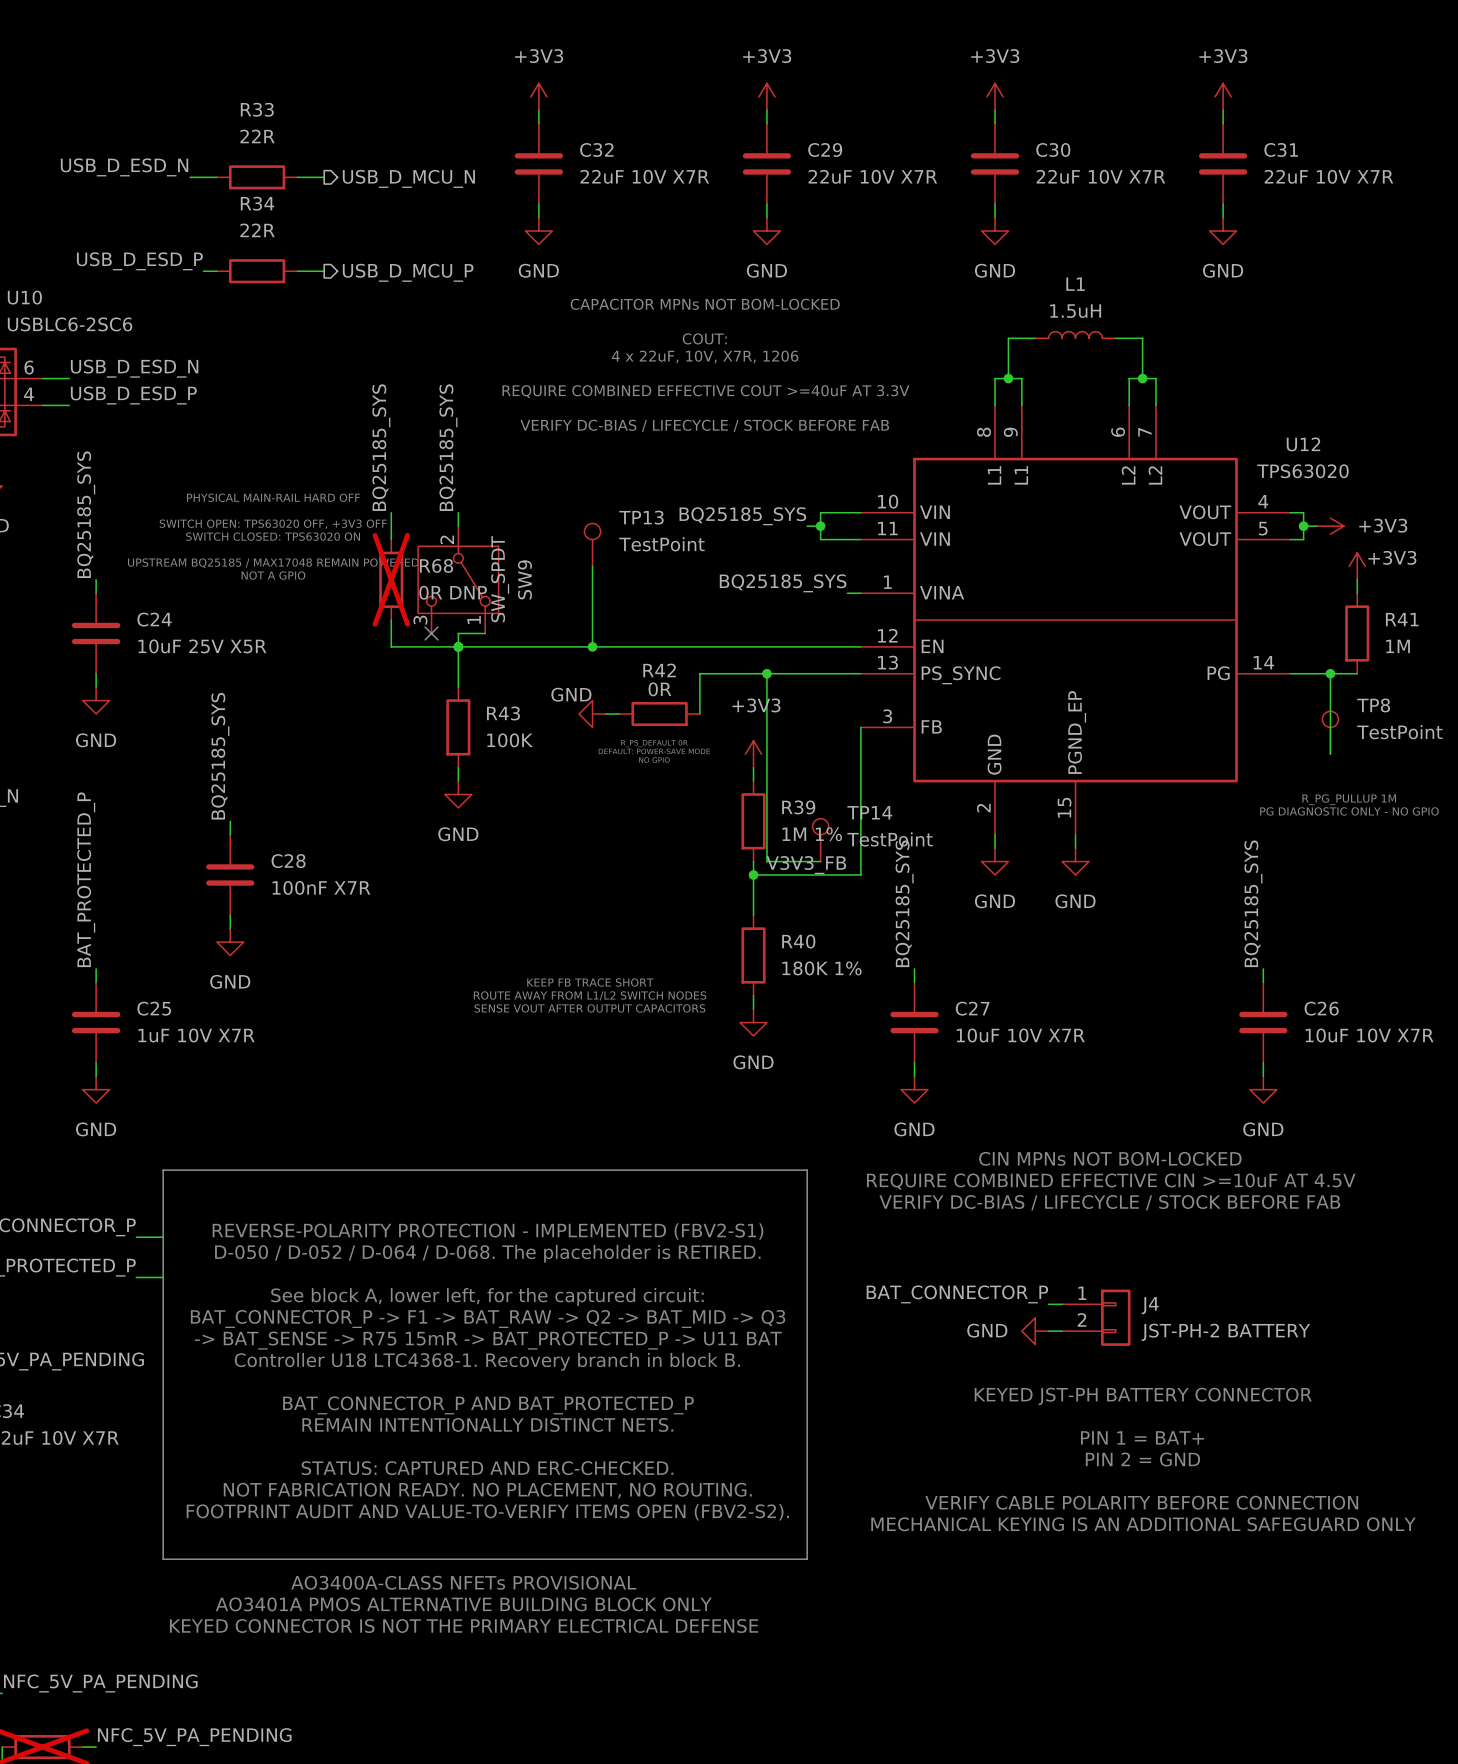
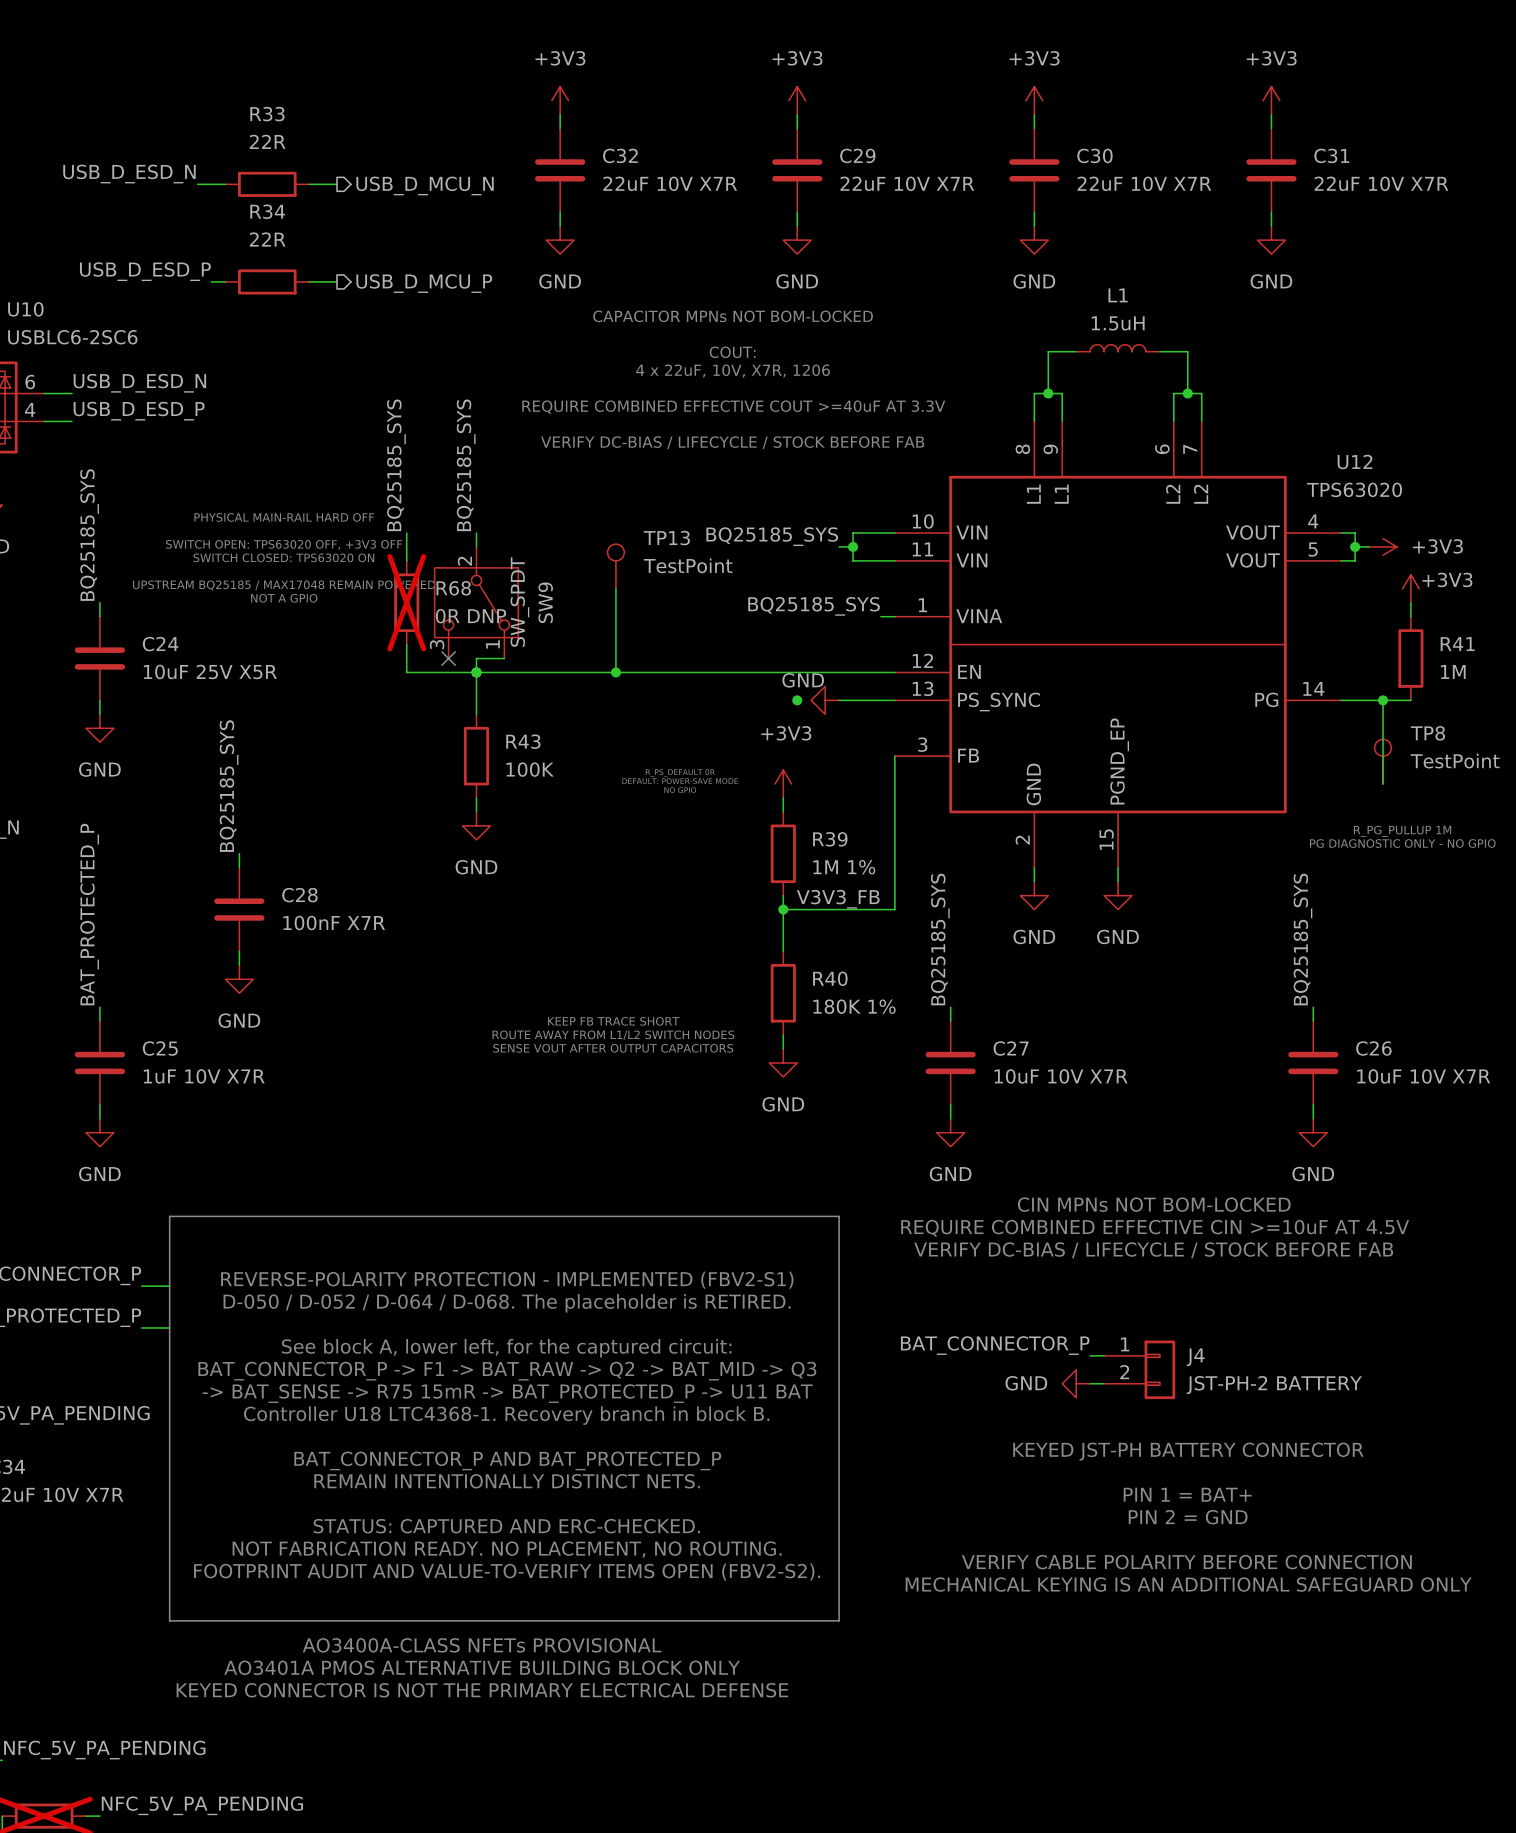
wire: (766, 673) (766, 861) (820, 861) -> none
wire: (807, 673) (699, 673) (699, 713) -> none
power symbol position: GND (592, 713) -> GND (825, 700)
wire: (605, 713) (619, 713) -> none
R42: 0R (659, 713) -> none
TP14: TestPoint (820, 840) -> none

